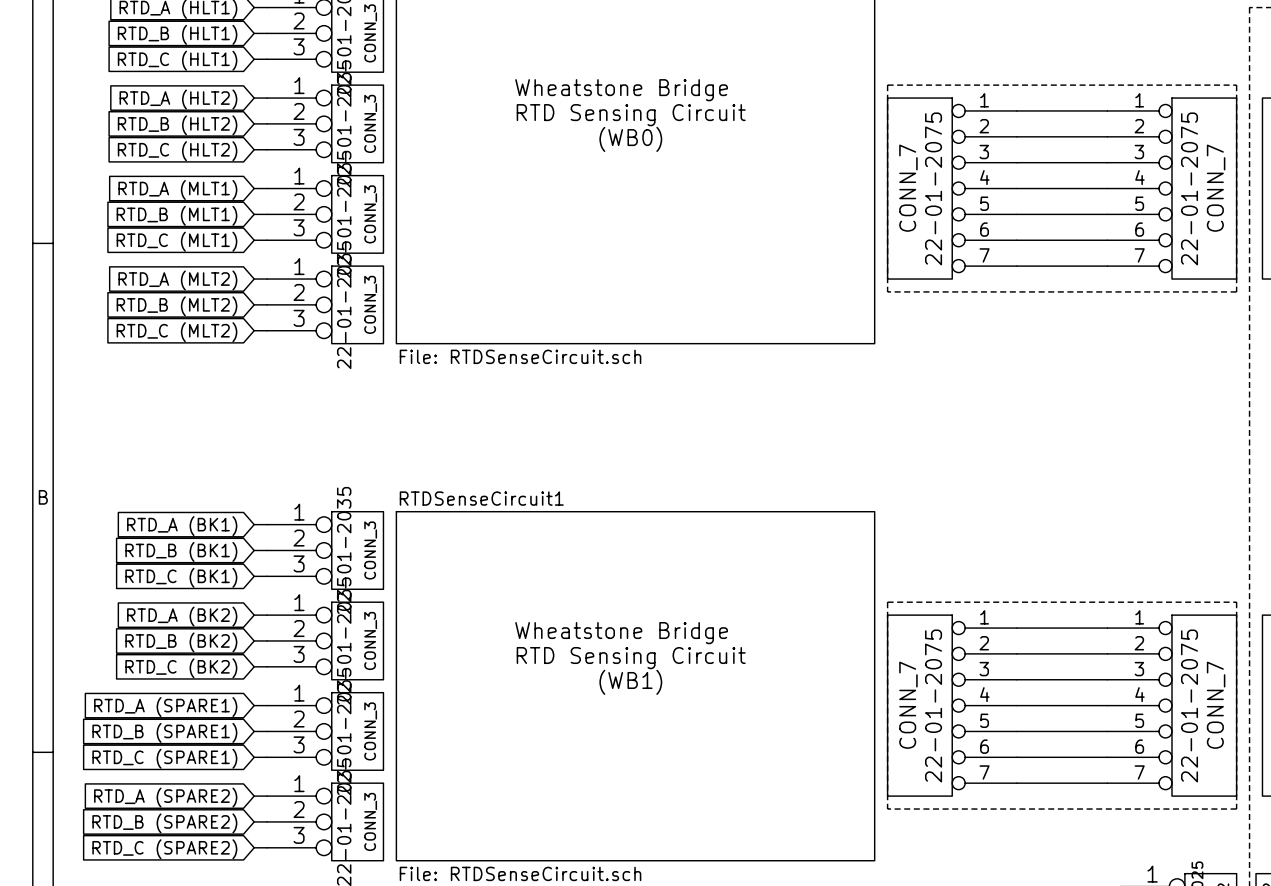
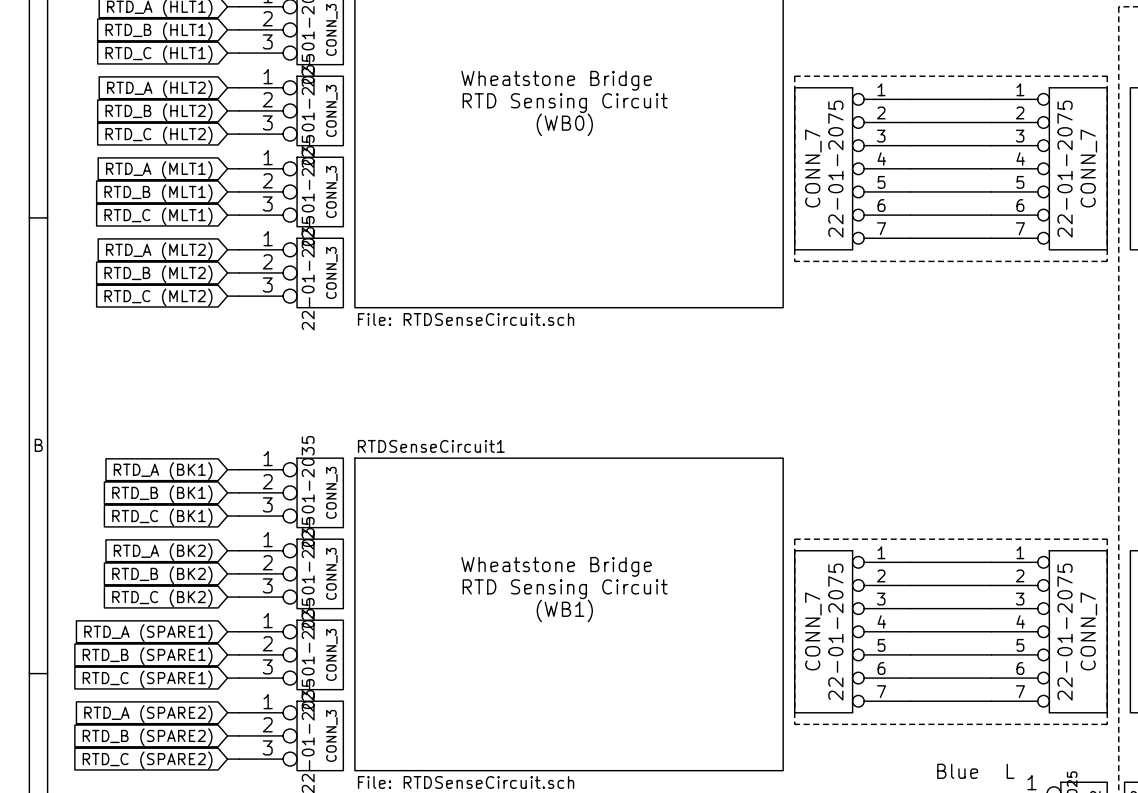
text: none -> Blue (957, 771)
text: none -> L (1010, 771)

